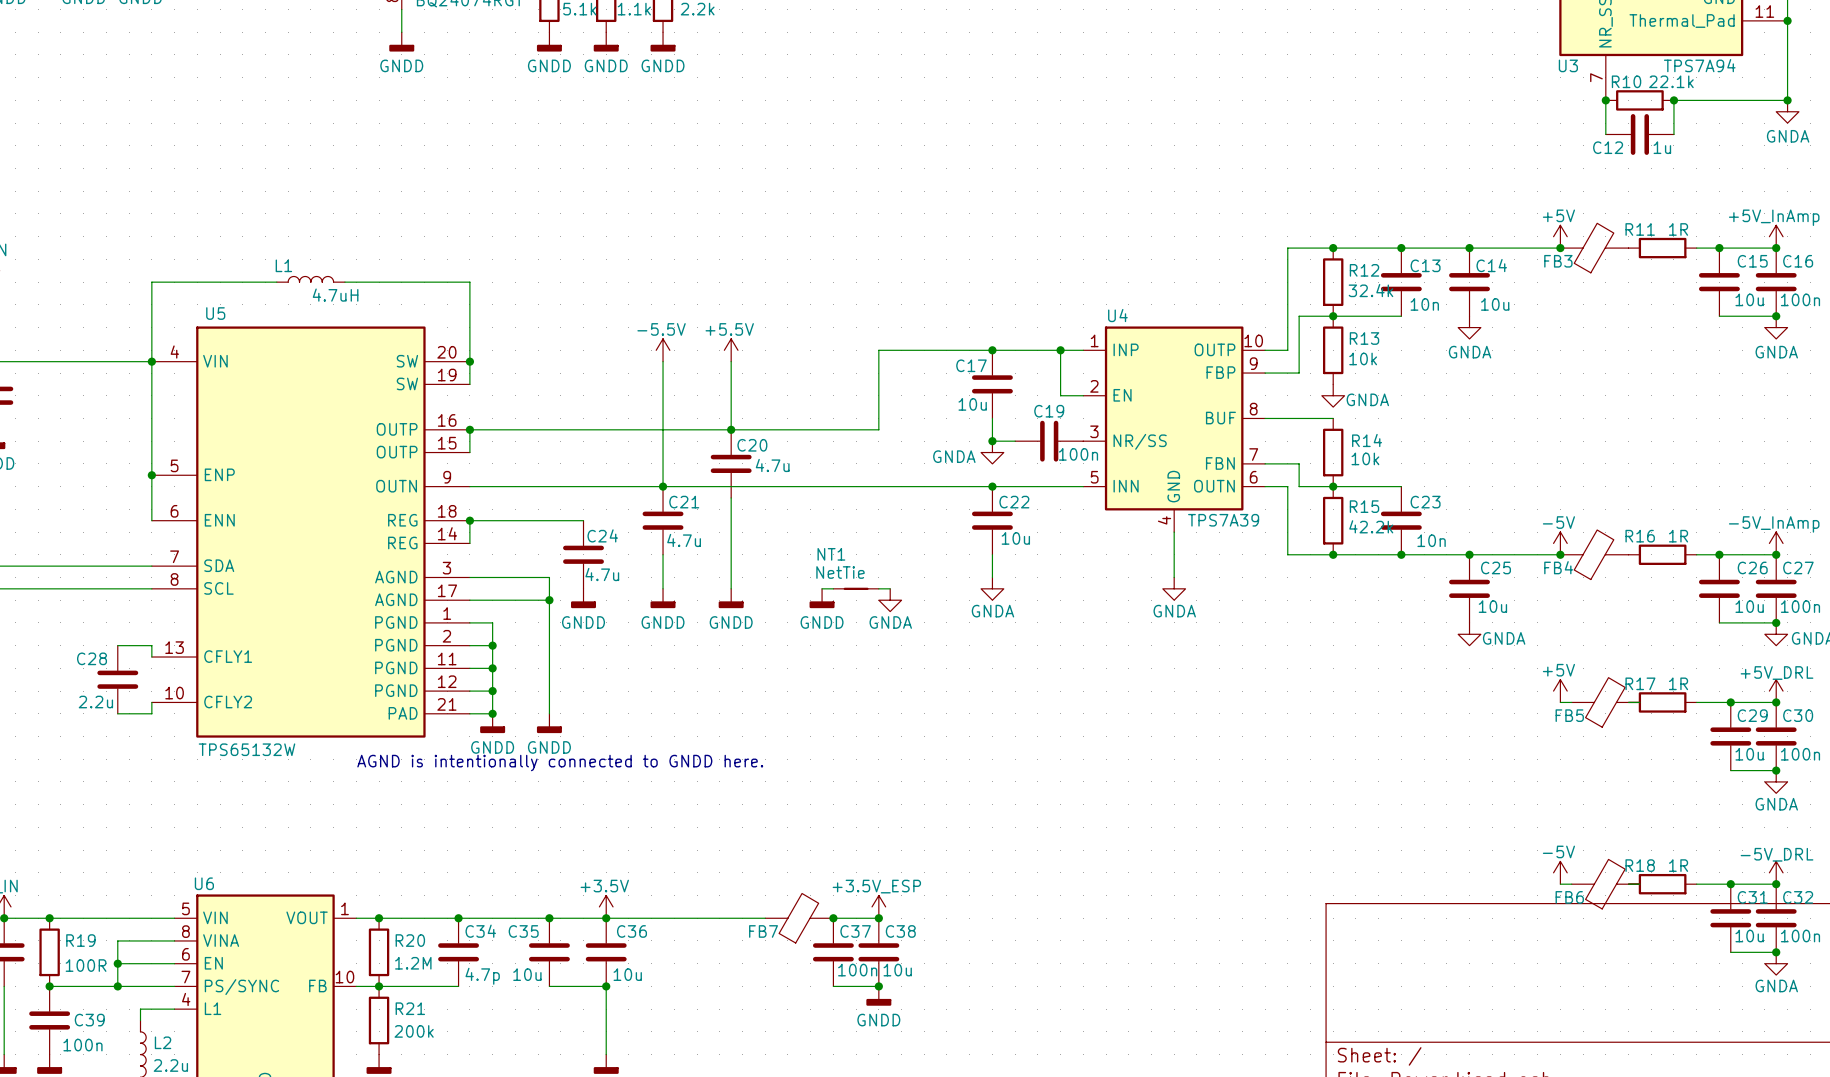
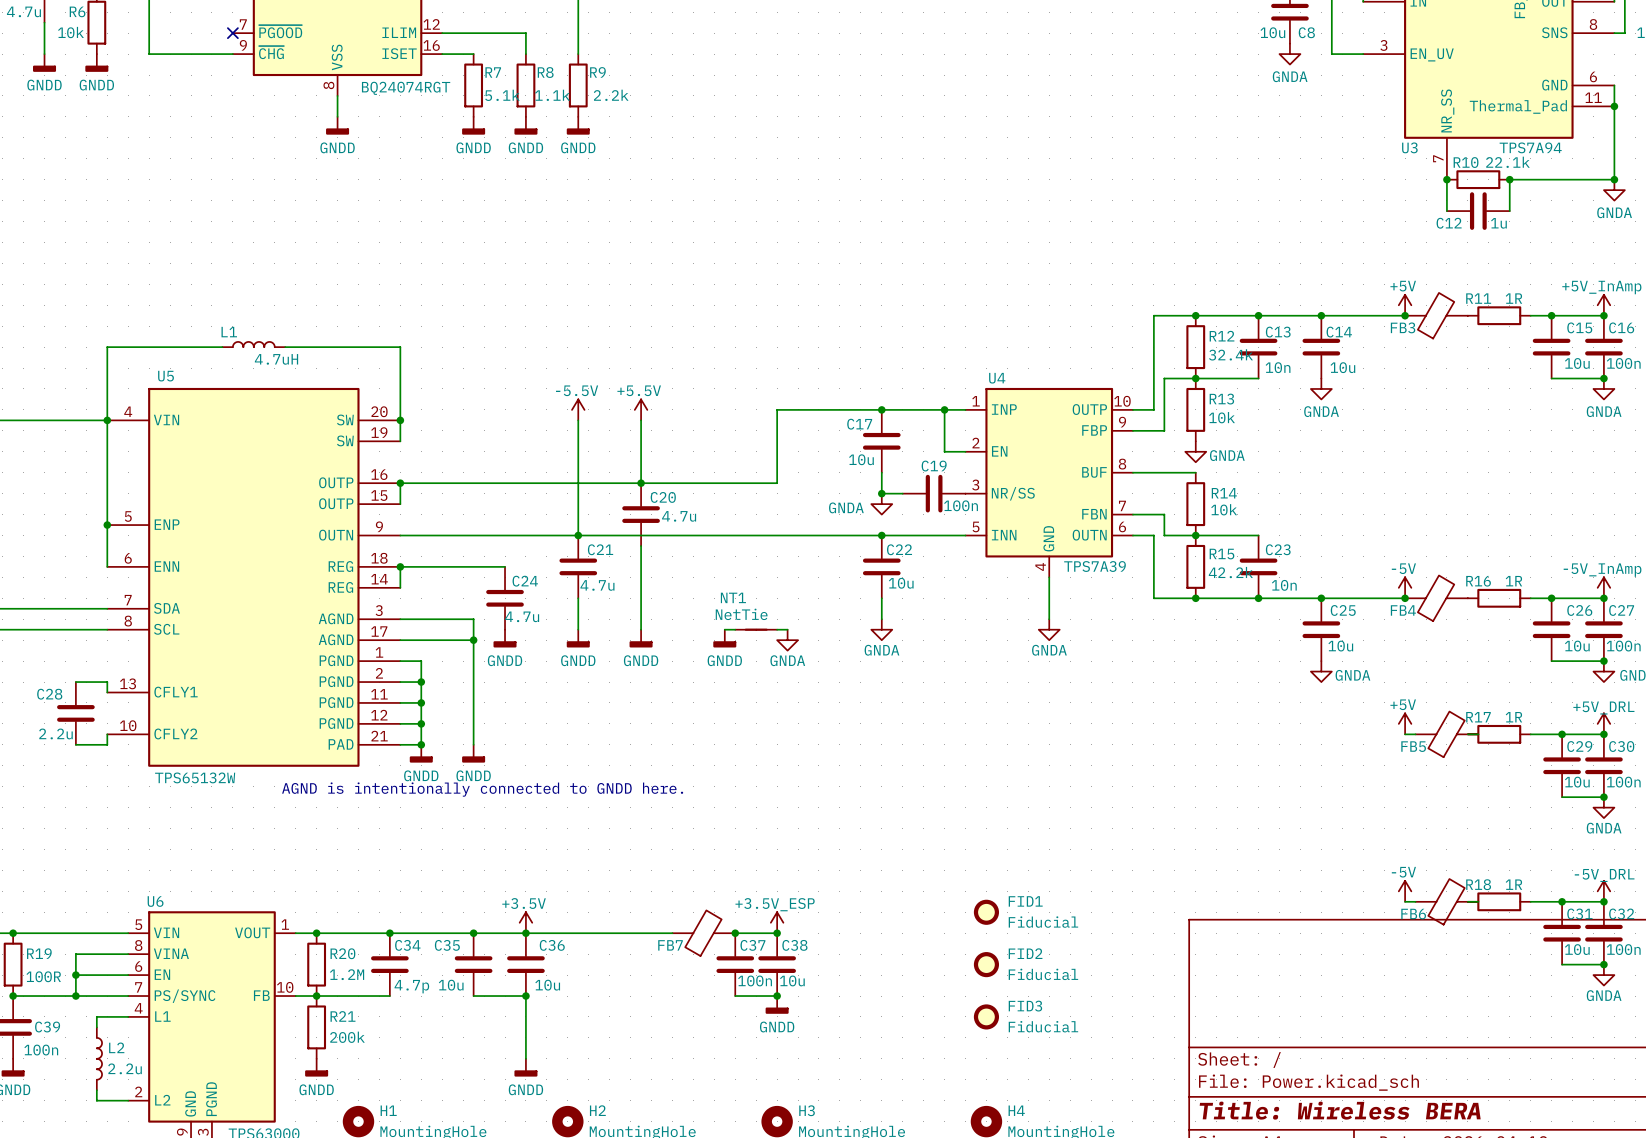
FID1: none -> Fiducial (986, 912)
FID2: none -> Fiducial (986, 964)
FID3: none -> Fiducial (986, 1016)

